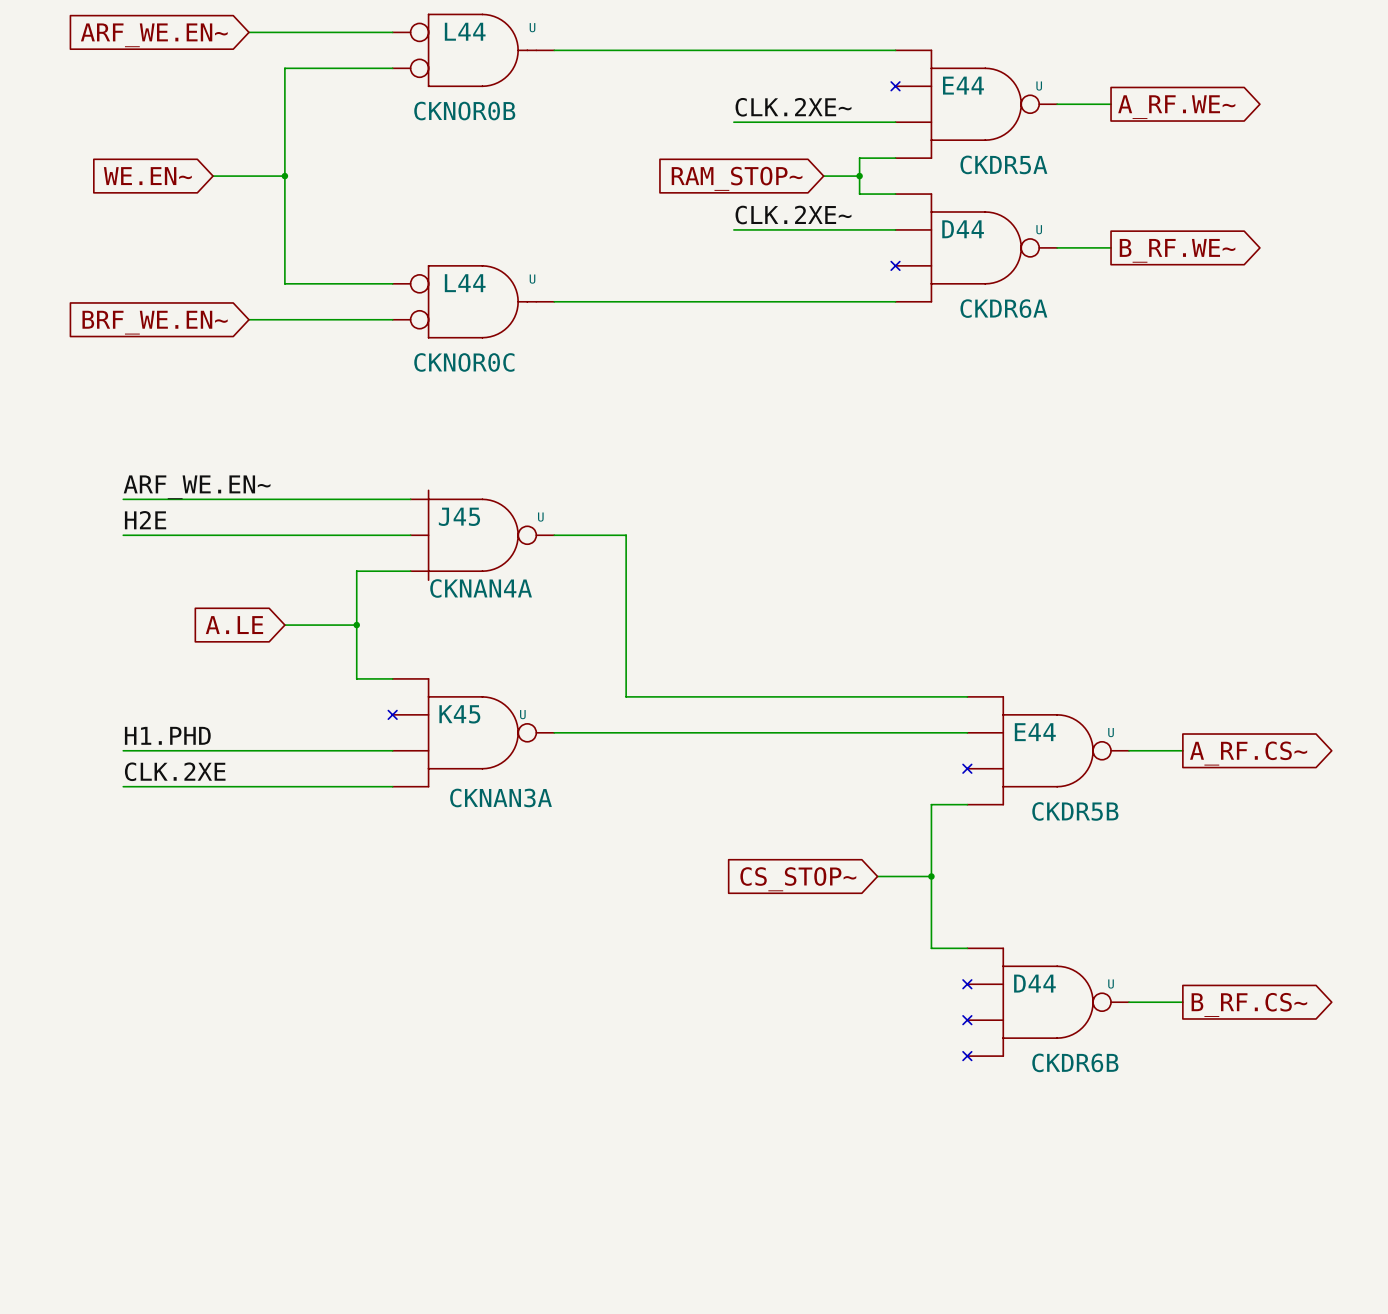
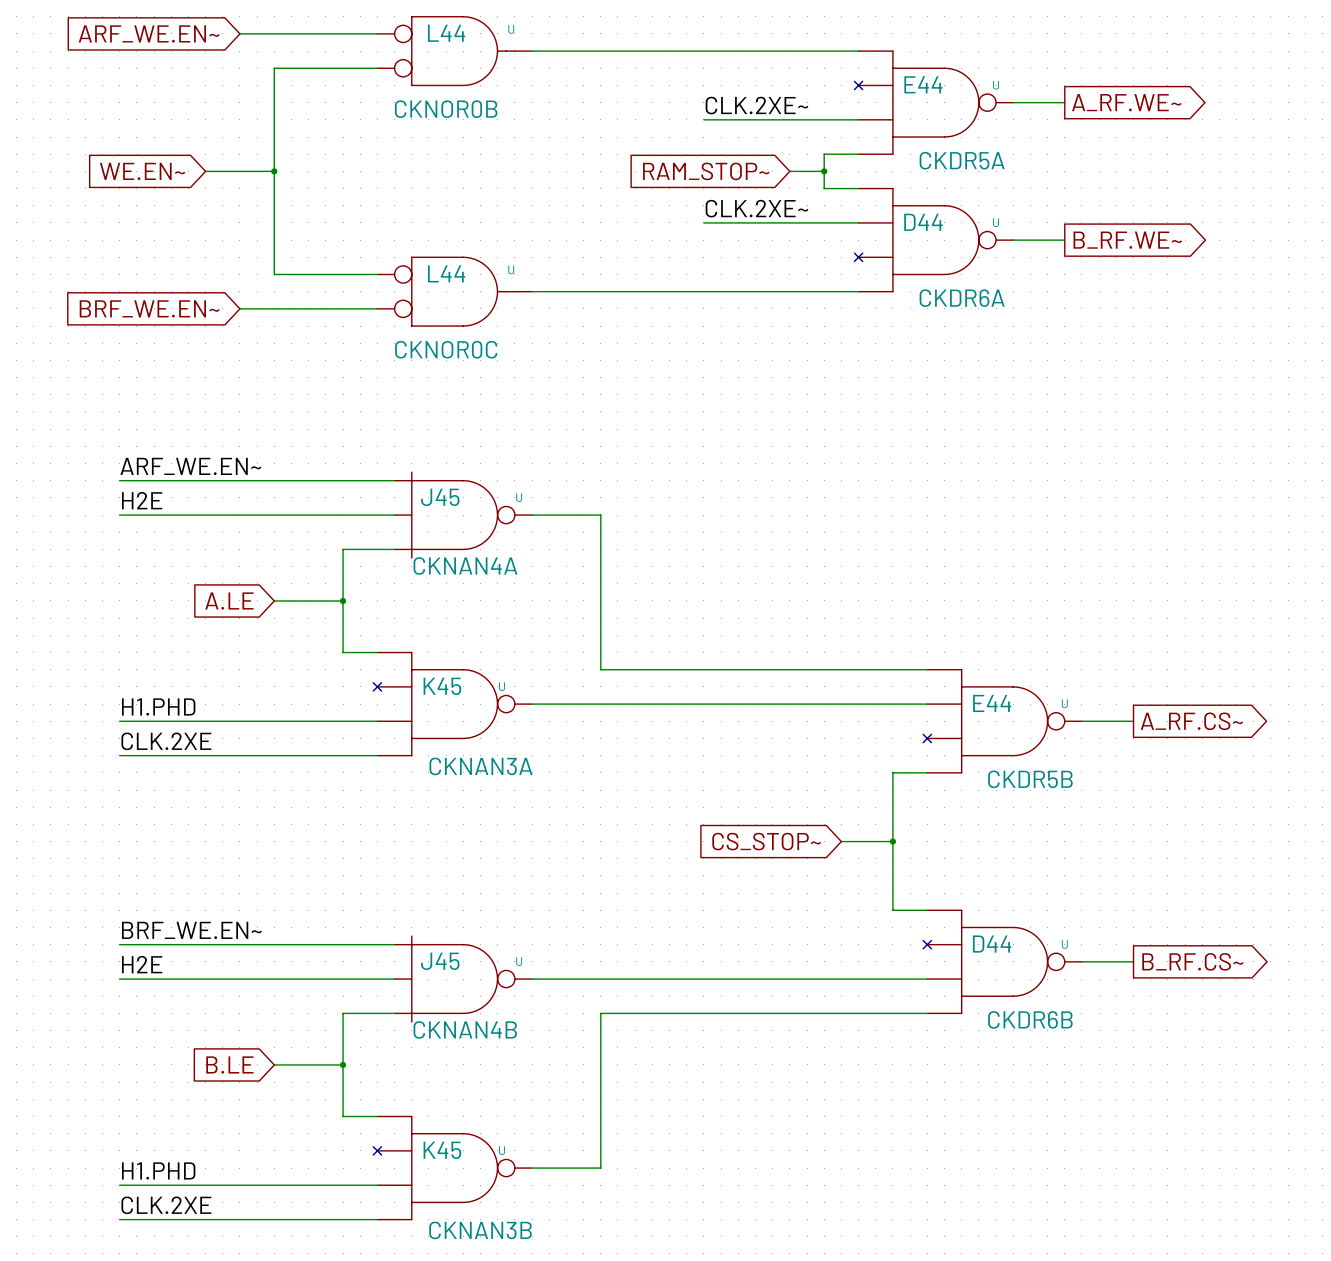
label: none -> BRF_WE.EN~ (191, 930)
wire: none -> (119, 944) (394, 944)
label: none -> H2E (142, 964)
wire: none -> (119, 979) (394, 979)
U: none -> (463, 979)
wire: none -> (532, 979) (927, 979)
no-connect mark: (967, 1020) -> none
wire: none -> (394, 1013) (343, 1013) (343, 1116) (377, 1116)
wire: none -> (927, 1013) (600, 1013) (600, 1168) (532, 1168)
no-connect mark: (967, 1056) -> none
global label: none -> B.LE (229, 1064)
wire: none -> (274, 1064) (343, 1064)
junction: none -> (343, 1064)
no-connect mark: none -> (377, 1150)
U: none -> (454, 1168)
label: none -> H1.PHD (158, 1170)
wire: none -> (119, 1185) (377, 1185)
label: none -> CLK.2XE (166, 1205)
wire: none -> (119, 1219) (377, 1219)

